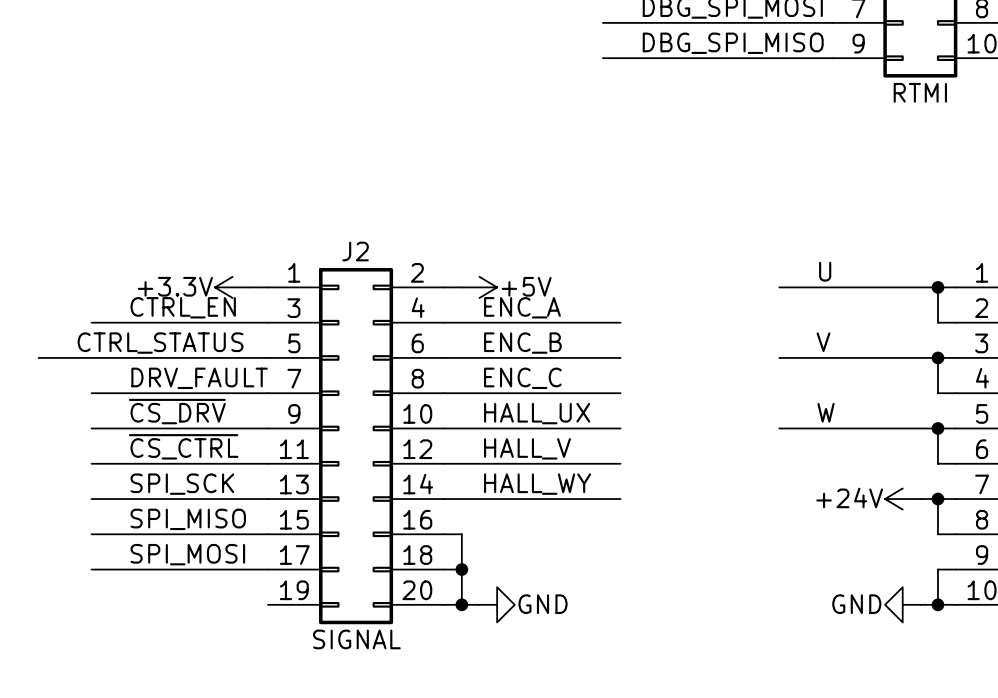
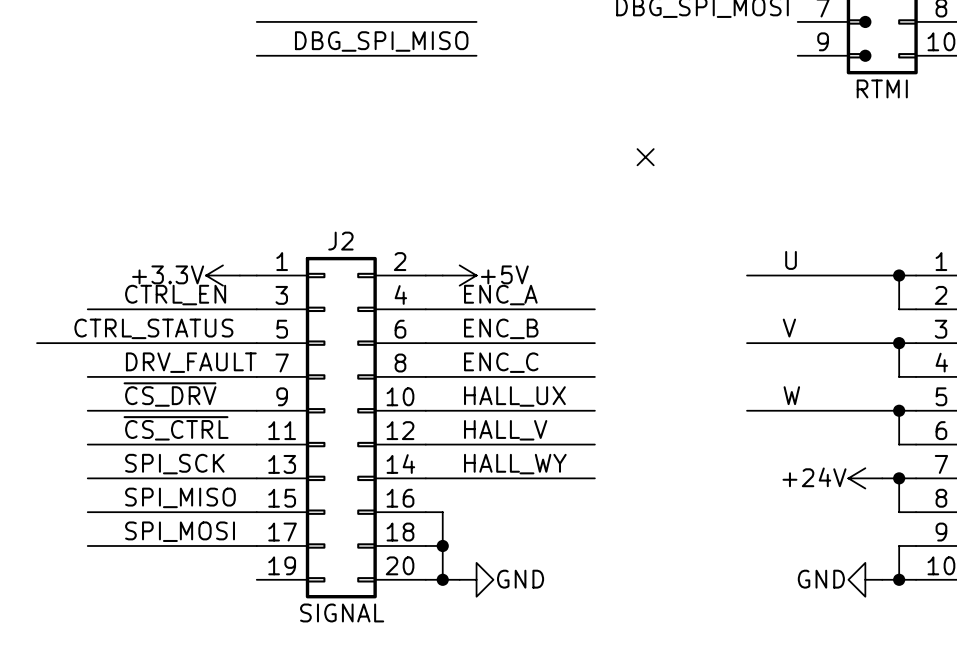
wire: (602, 22) (832, 22) -> (256, 21) (476, 21)
junction: none -> (865, 21)
label position: DBG_SPI_MISO (733, 43) -> DBG_SPI_MISO (381, 41)
wire: (602, 58) (832, 58) -> (256, 55) (476, 55)
junction: none -> (865, 55)
no-connect mark: none -> (645, 157)

